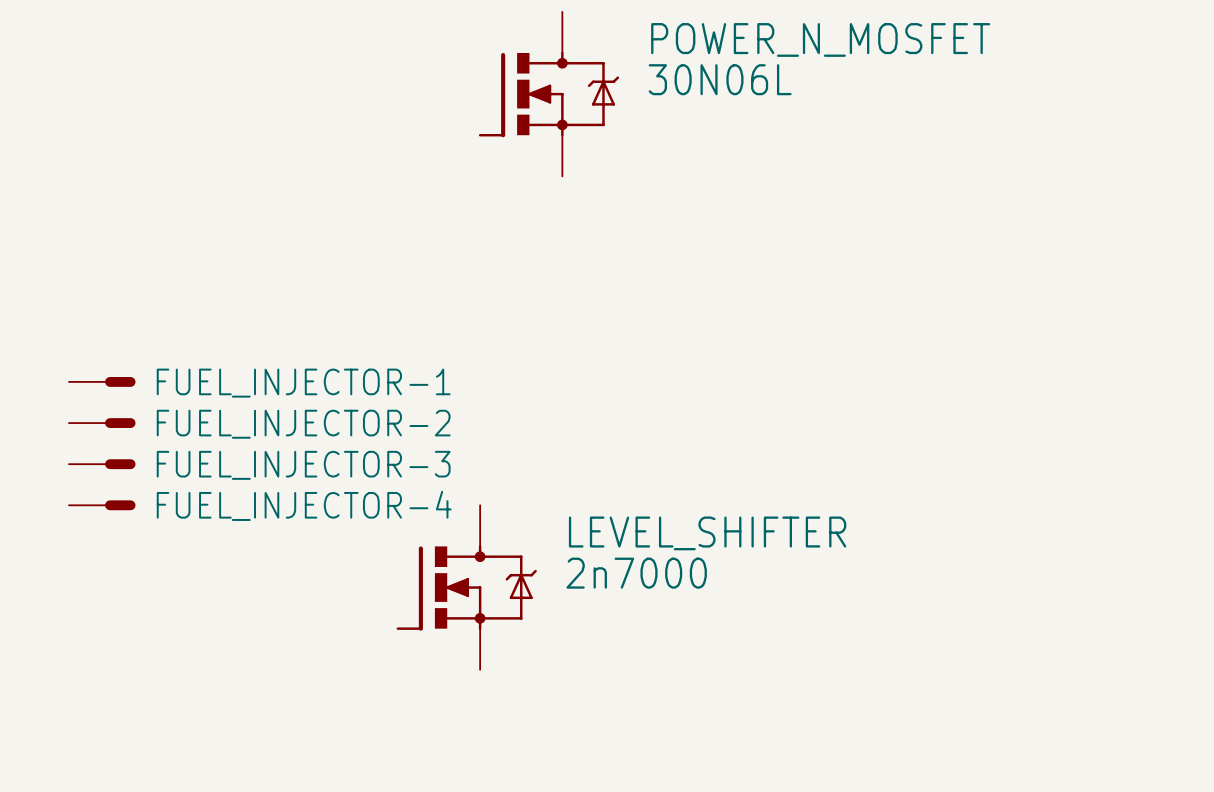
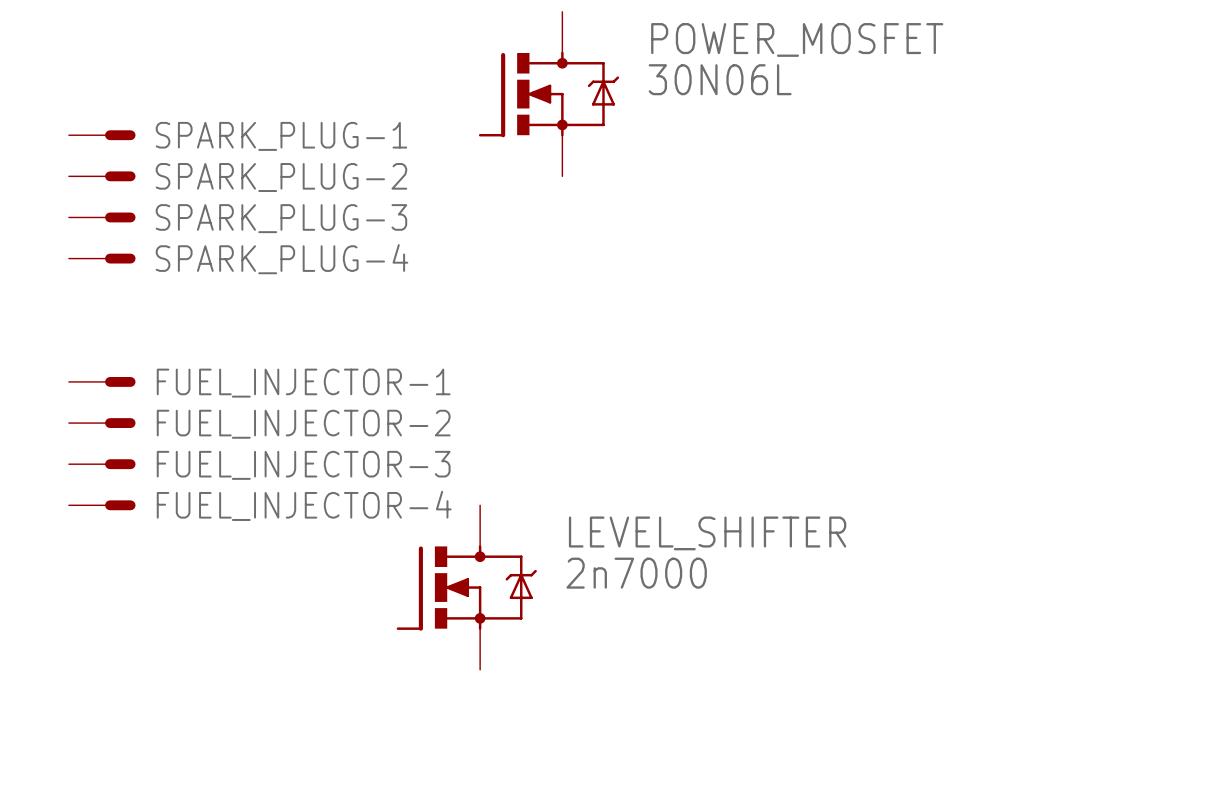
POWER_N_MOSFET name: POWER_N_MOSFET (820, 39) -> POWER_MOSFET (797, 39)
SPARK_PLUG-1: none -> (102, 135)
SPARK_PLUG-2: none -> (102, 176)
SPARK_PLUG-3: none -> (102, 217)
SPARK_PLUG-4: none -> (102, 258)

